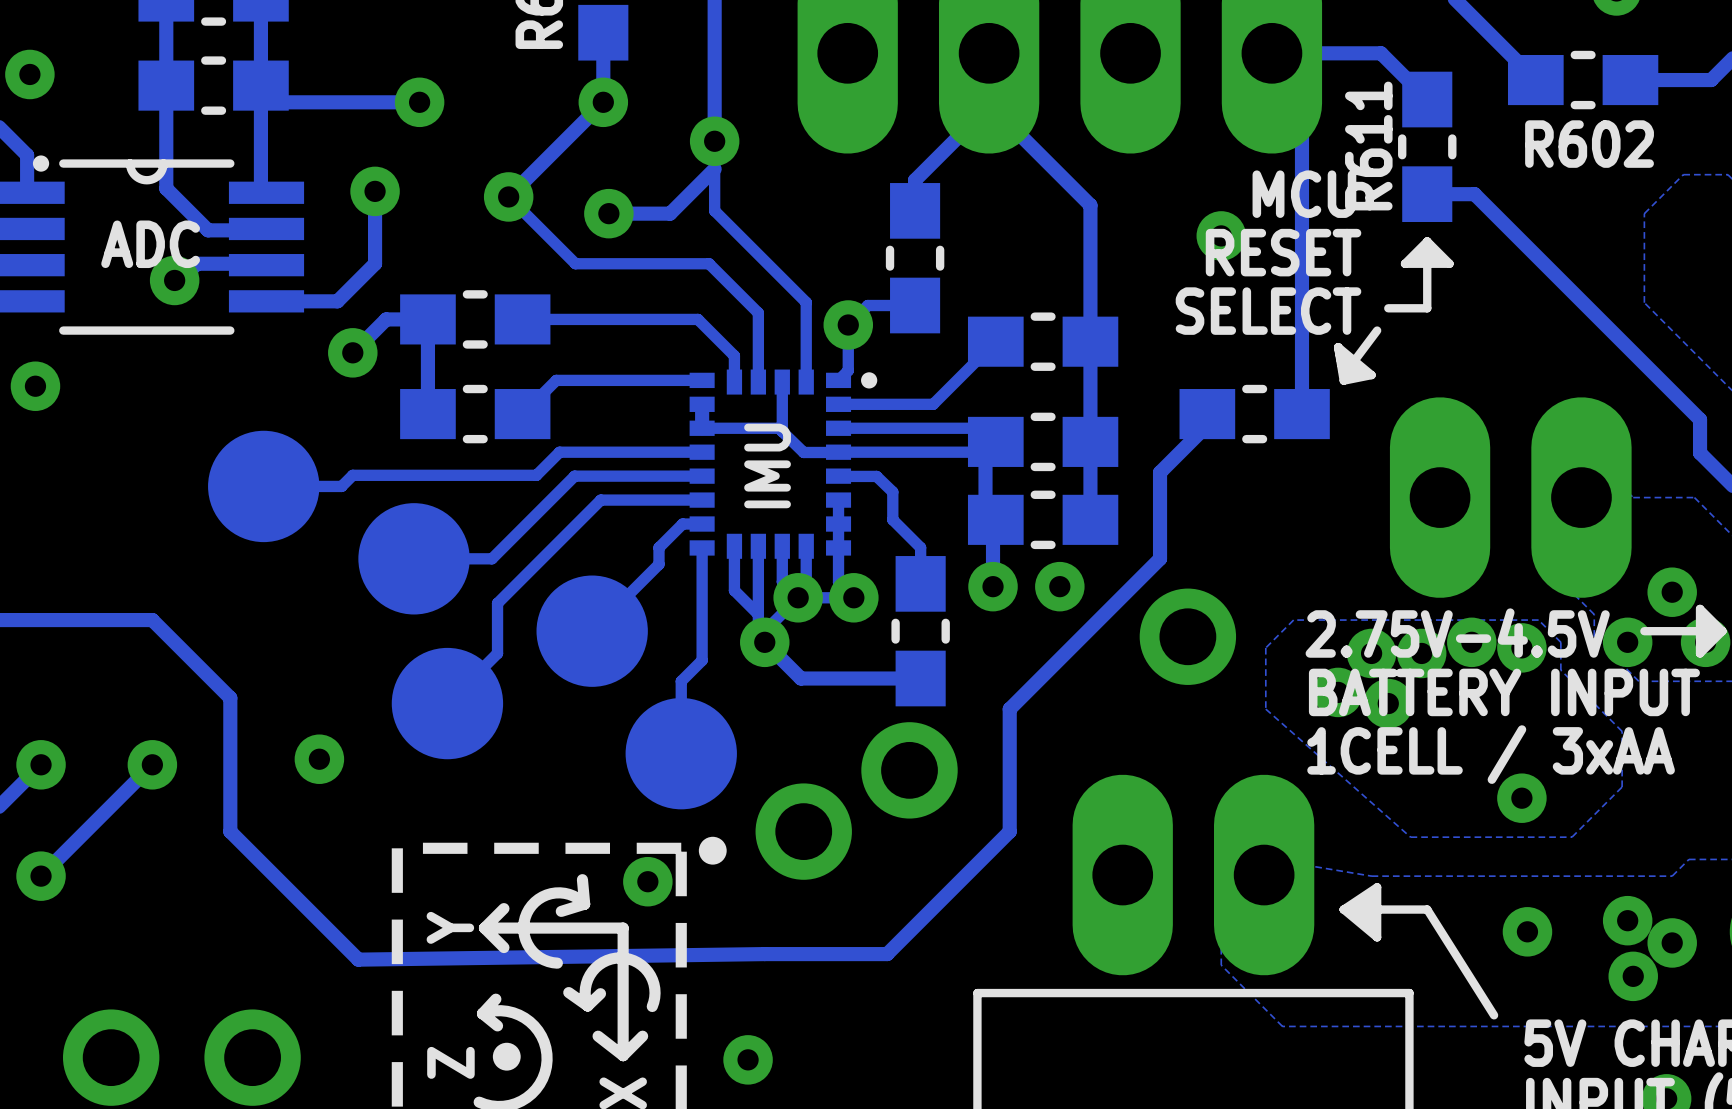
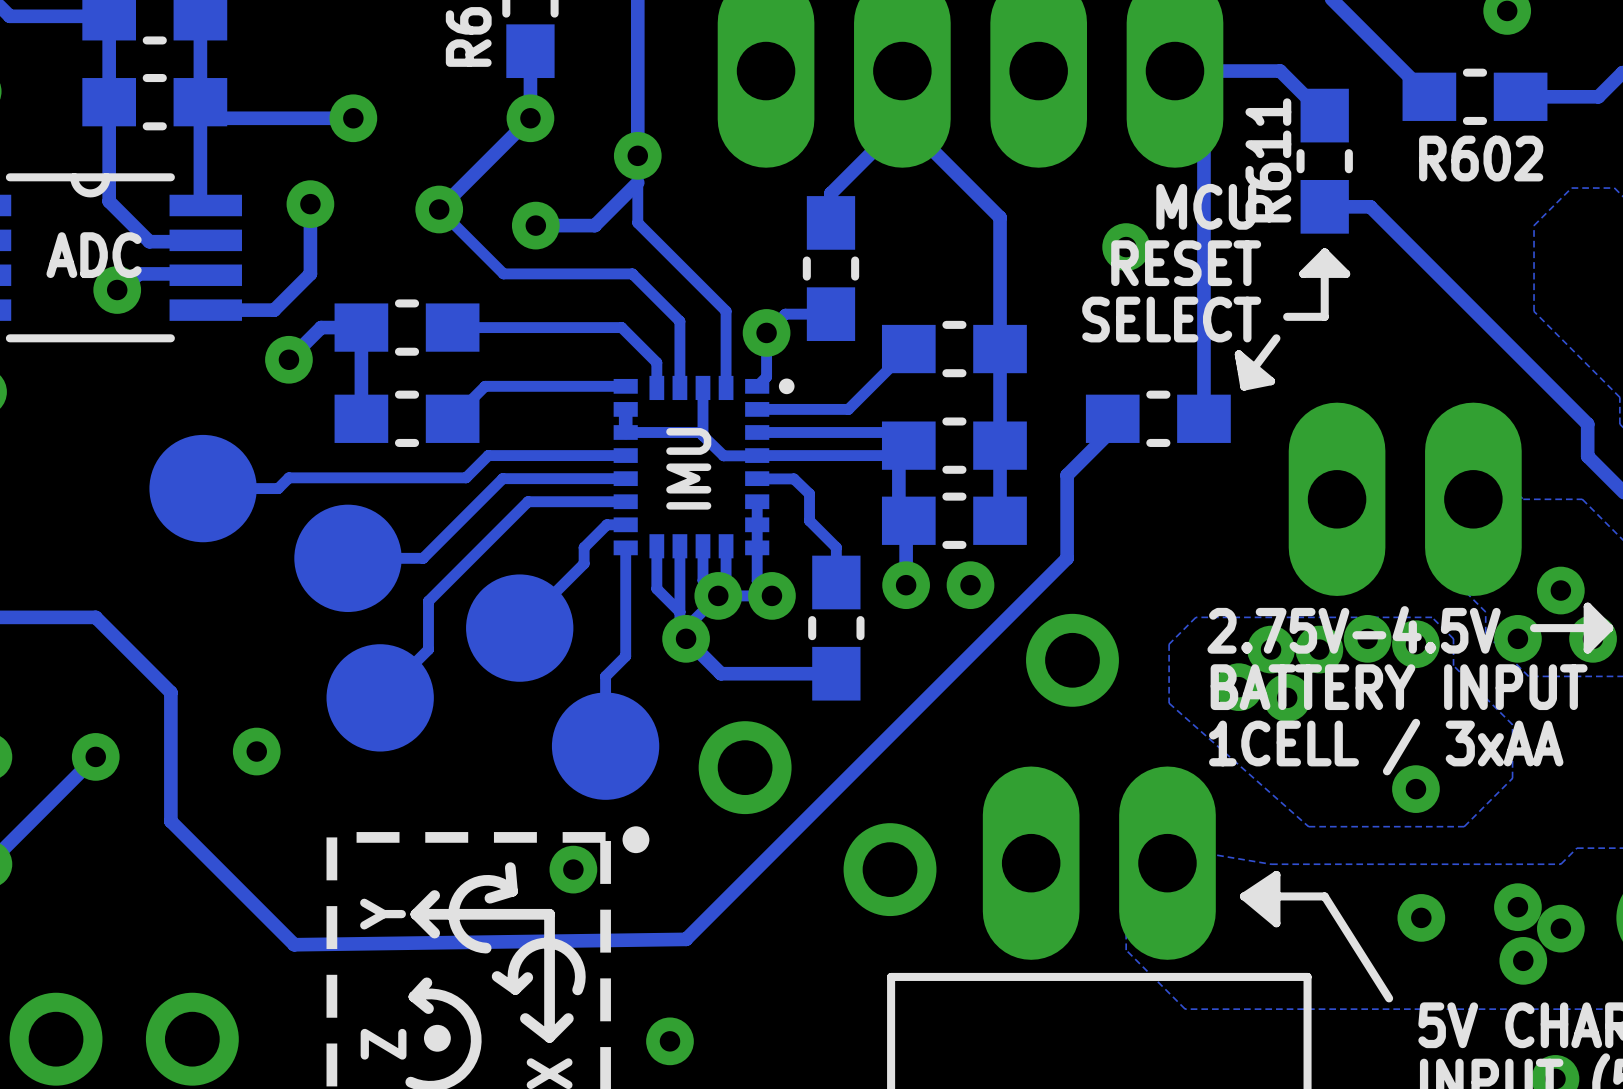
part position: (1187, 636) -> (1072, 660)
track: (1009, 709) (1009, 831) (887, 954) (764, 954) -> (922, 703) (686, 939)
part: (909, 770) -> none
part: none -> (745, 767)
part: (803, 831) -> none
part: none -> (890, 869)

